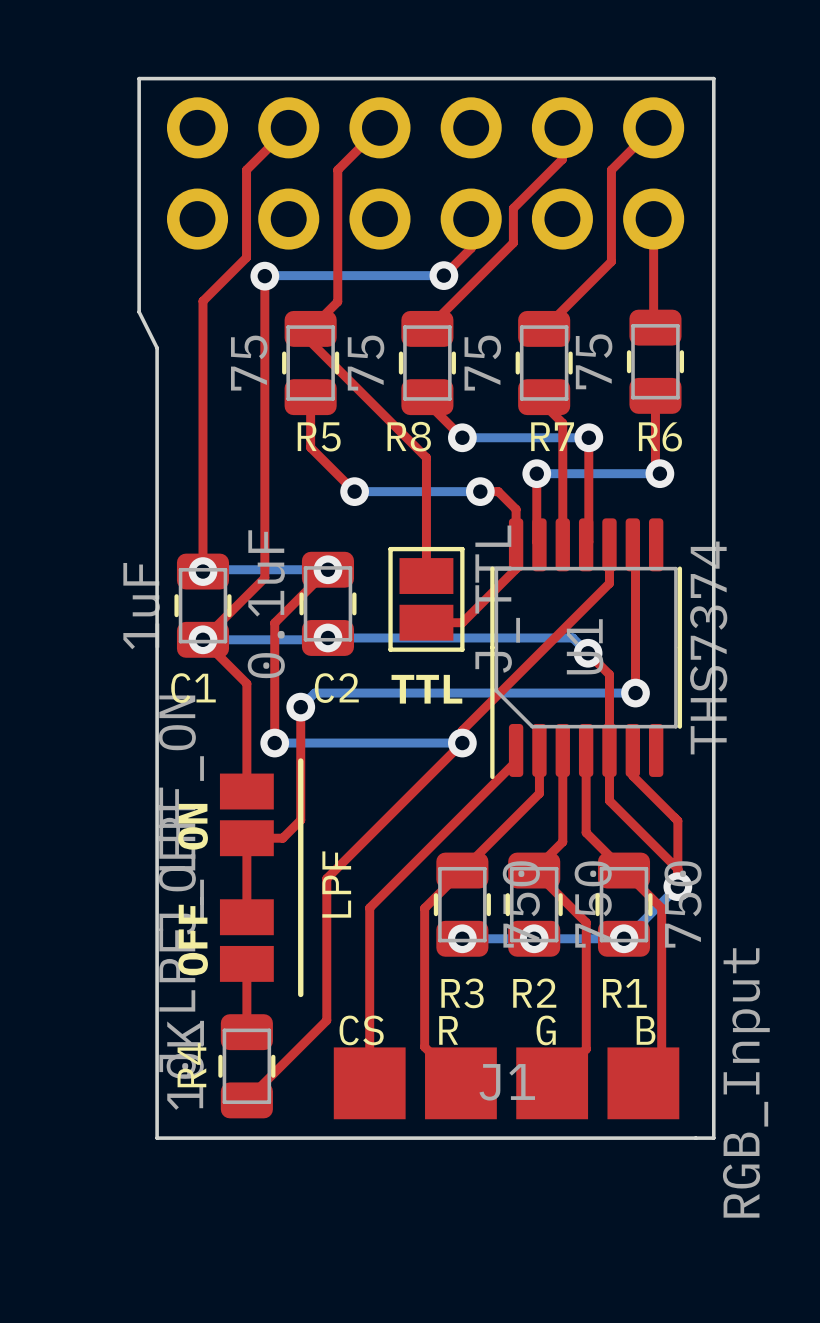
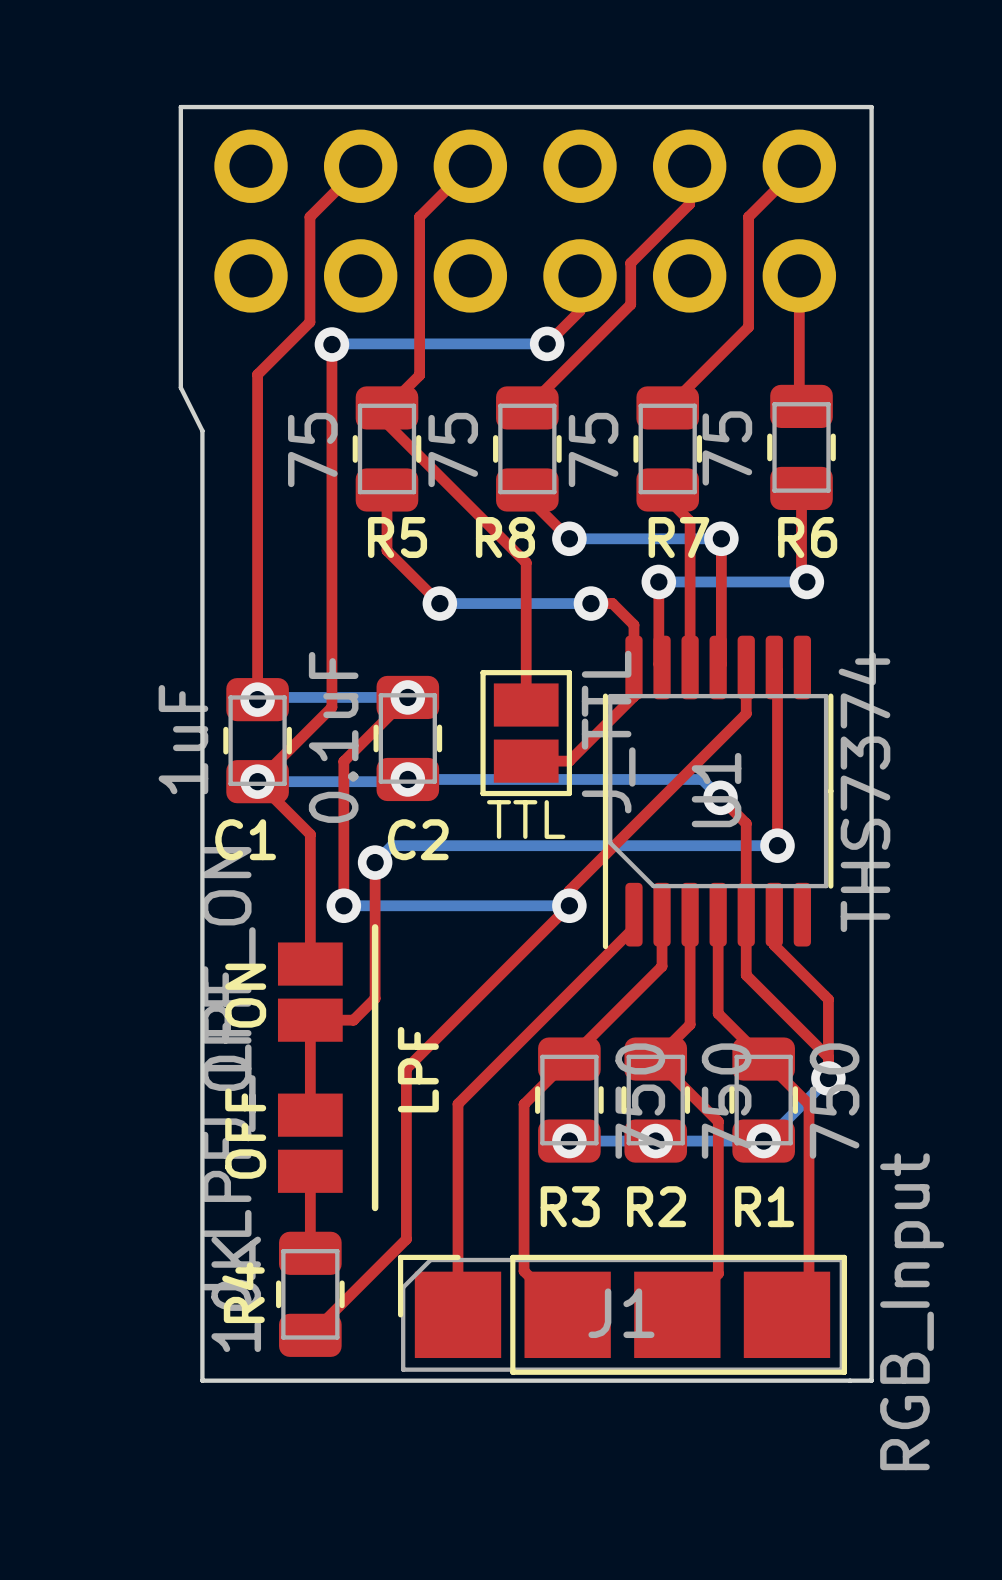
text position: TTL (426, 689) -> TTL (526, 819)
text: CS R G B (497, 1030) -> none
J1 footprint: [333, 1047, 680, 1120] -> [397, 1254, 847, 1375]

